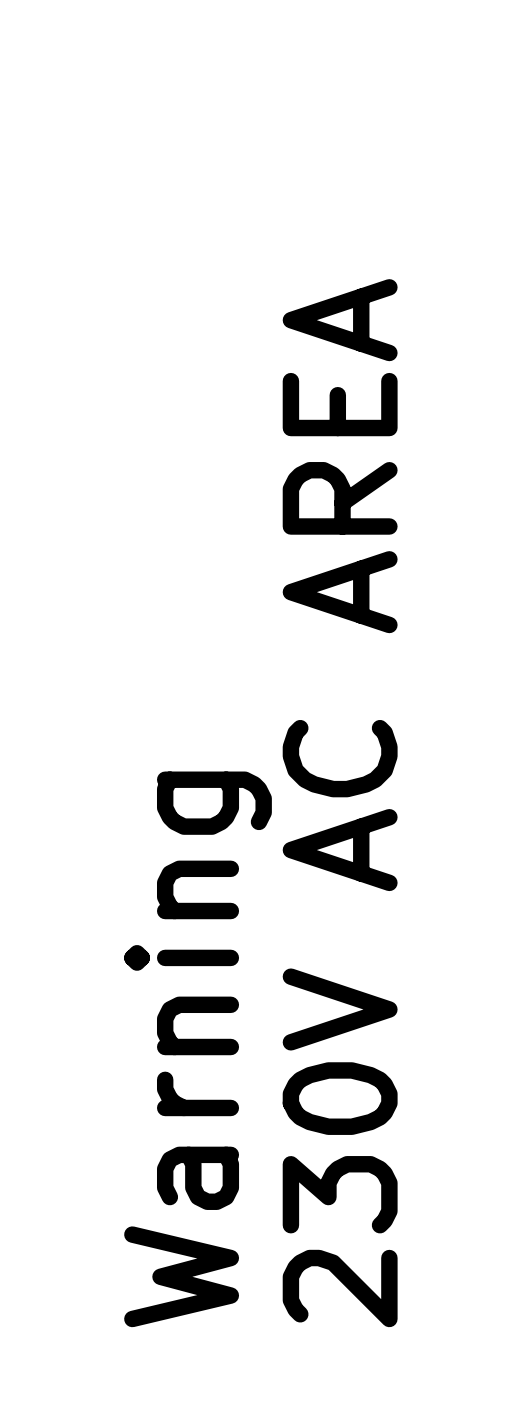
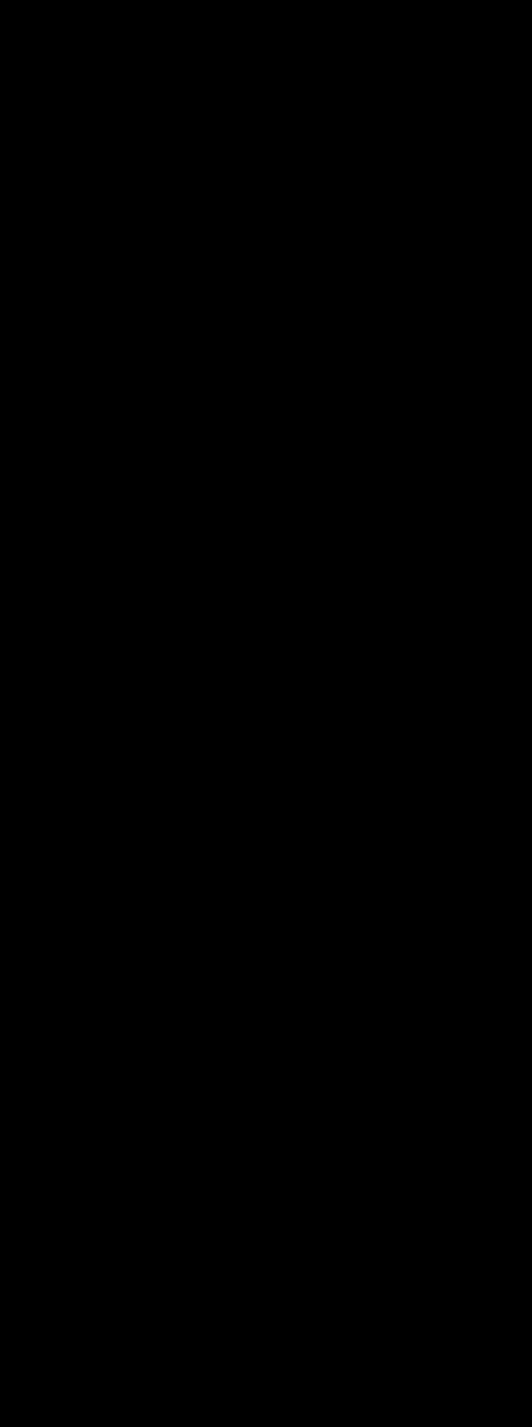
text: 230V AC AREA (340, 803) -> none
text: Warning (198, 1049) -> none

